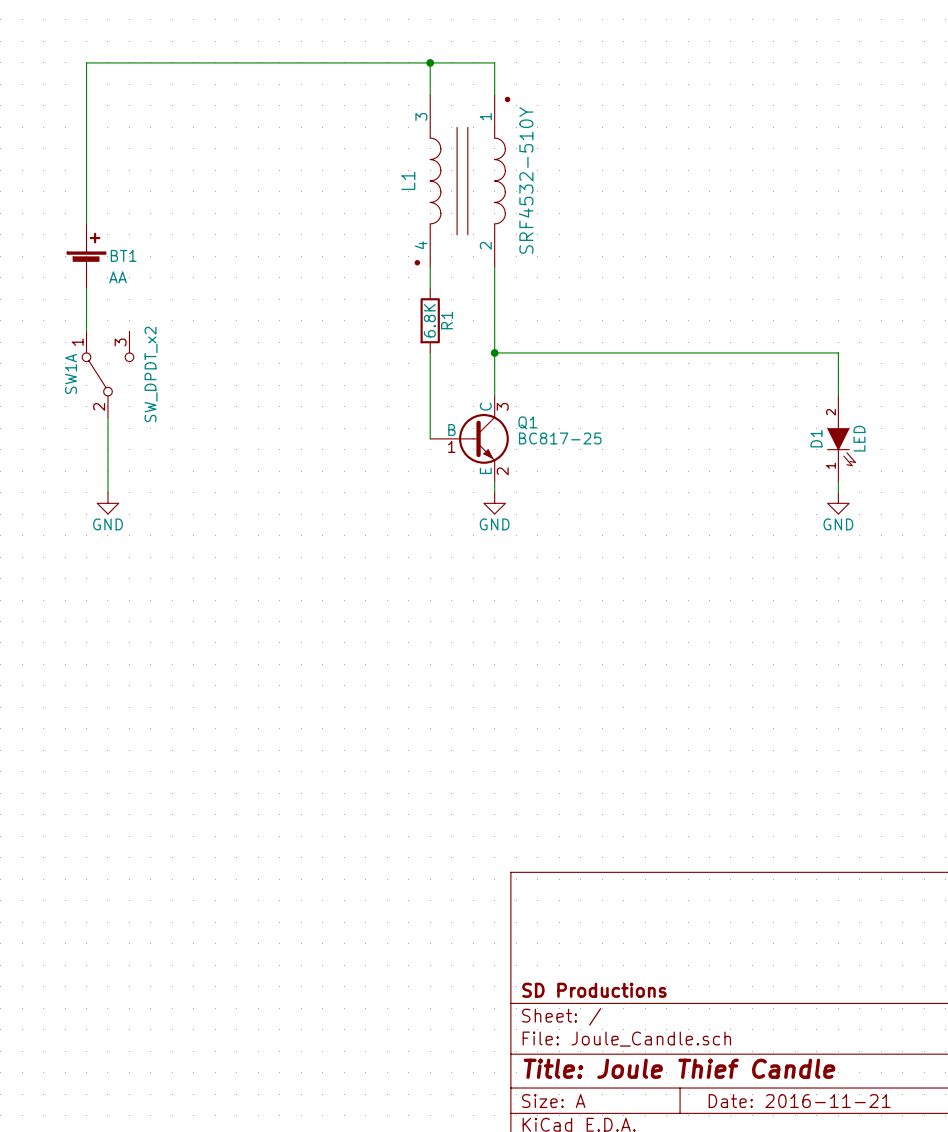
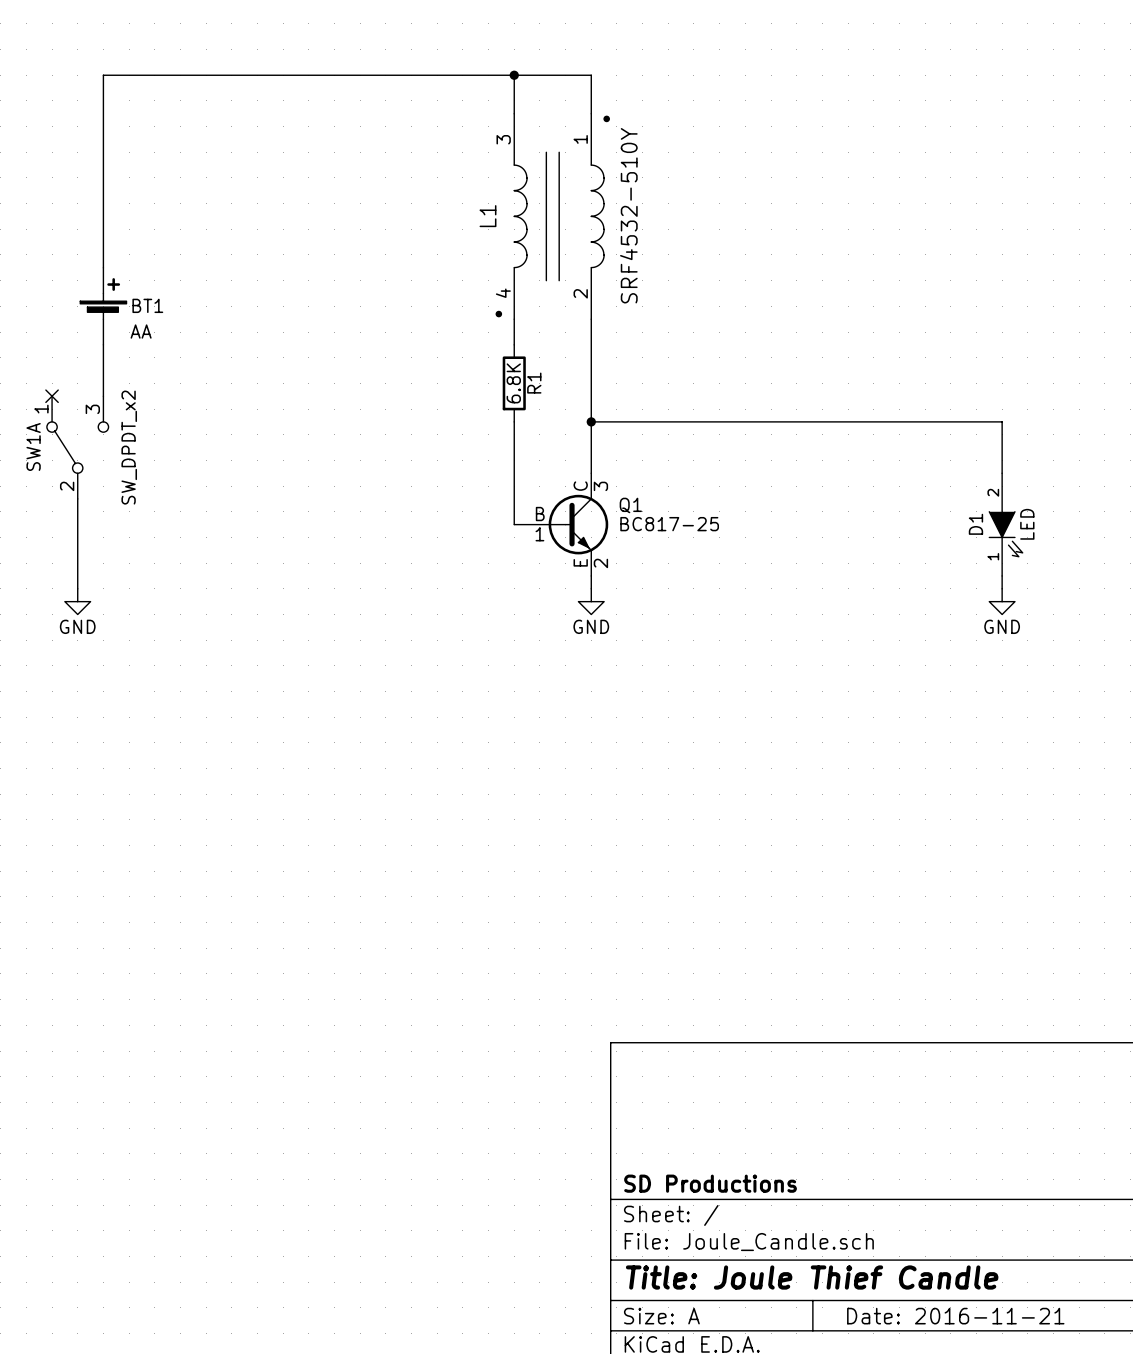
no-connect mark: none -> (52, 396)
SW1A position: (107, 374) -> (77, 447)
wire: (107, 417) (107, 492) -> (77, 498) (77, 588)
power symbol position: GND (107, 503) -> GND (77, 601)

